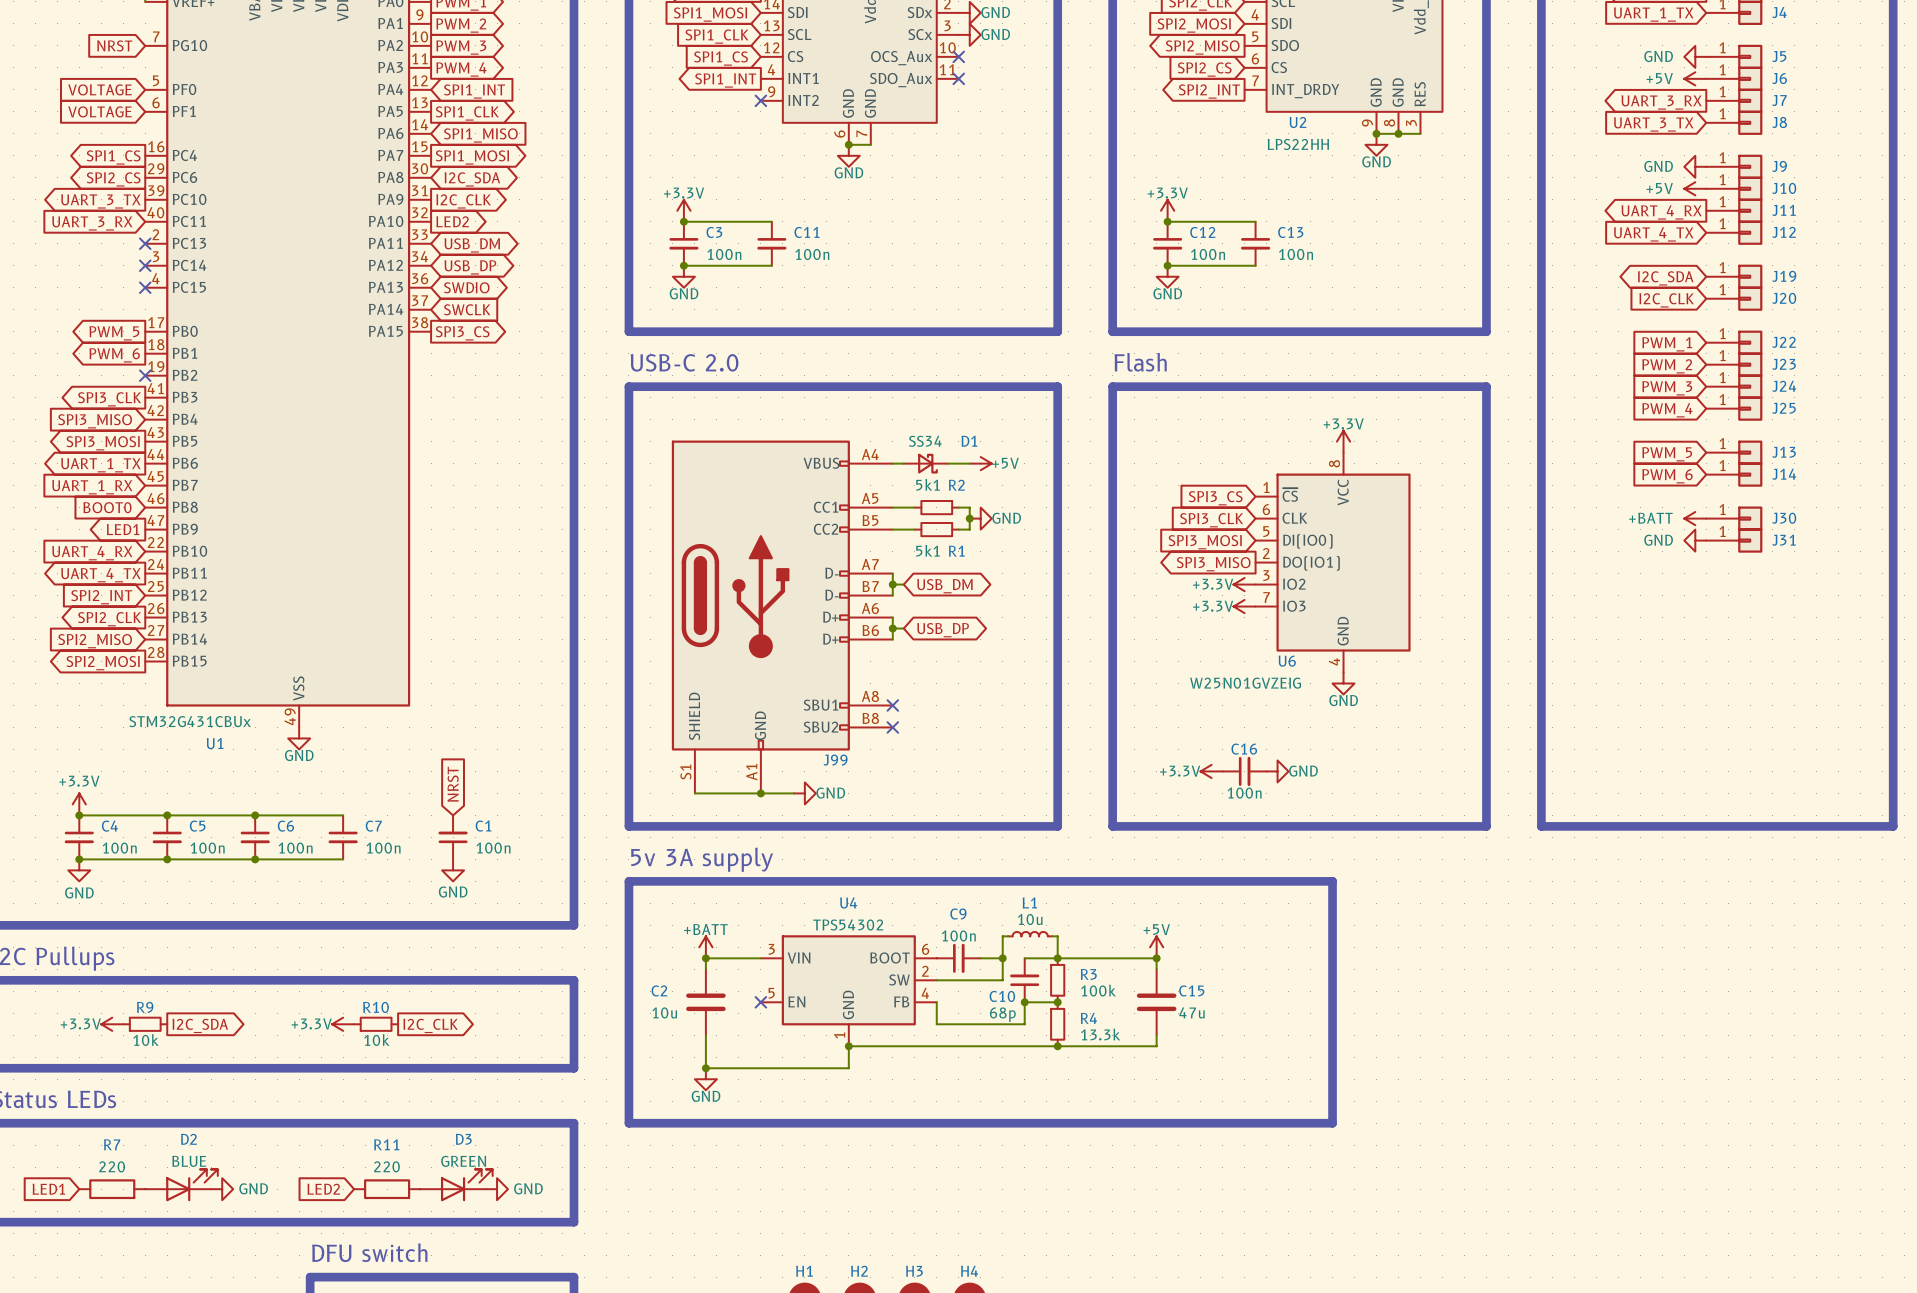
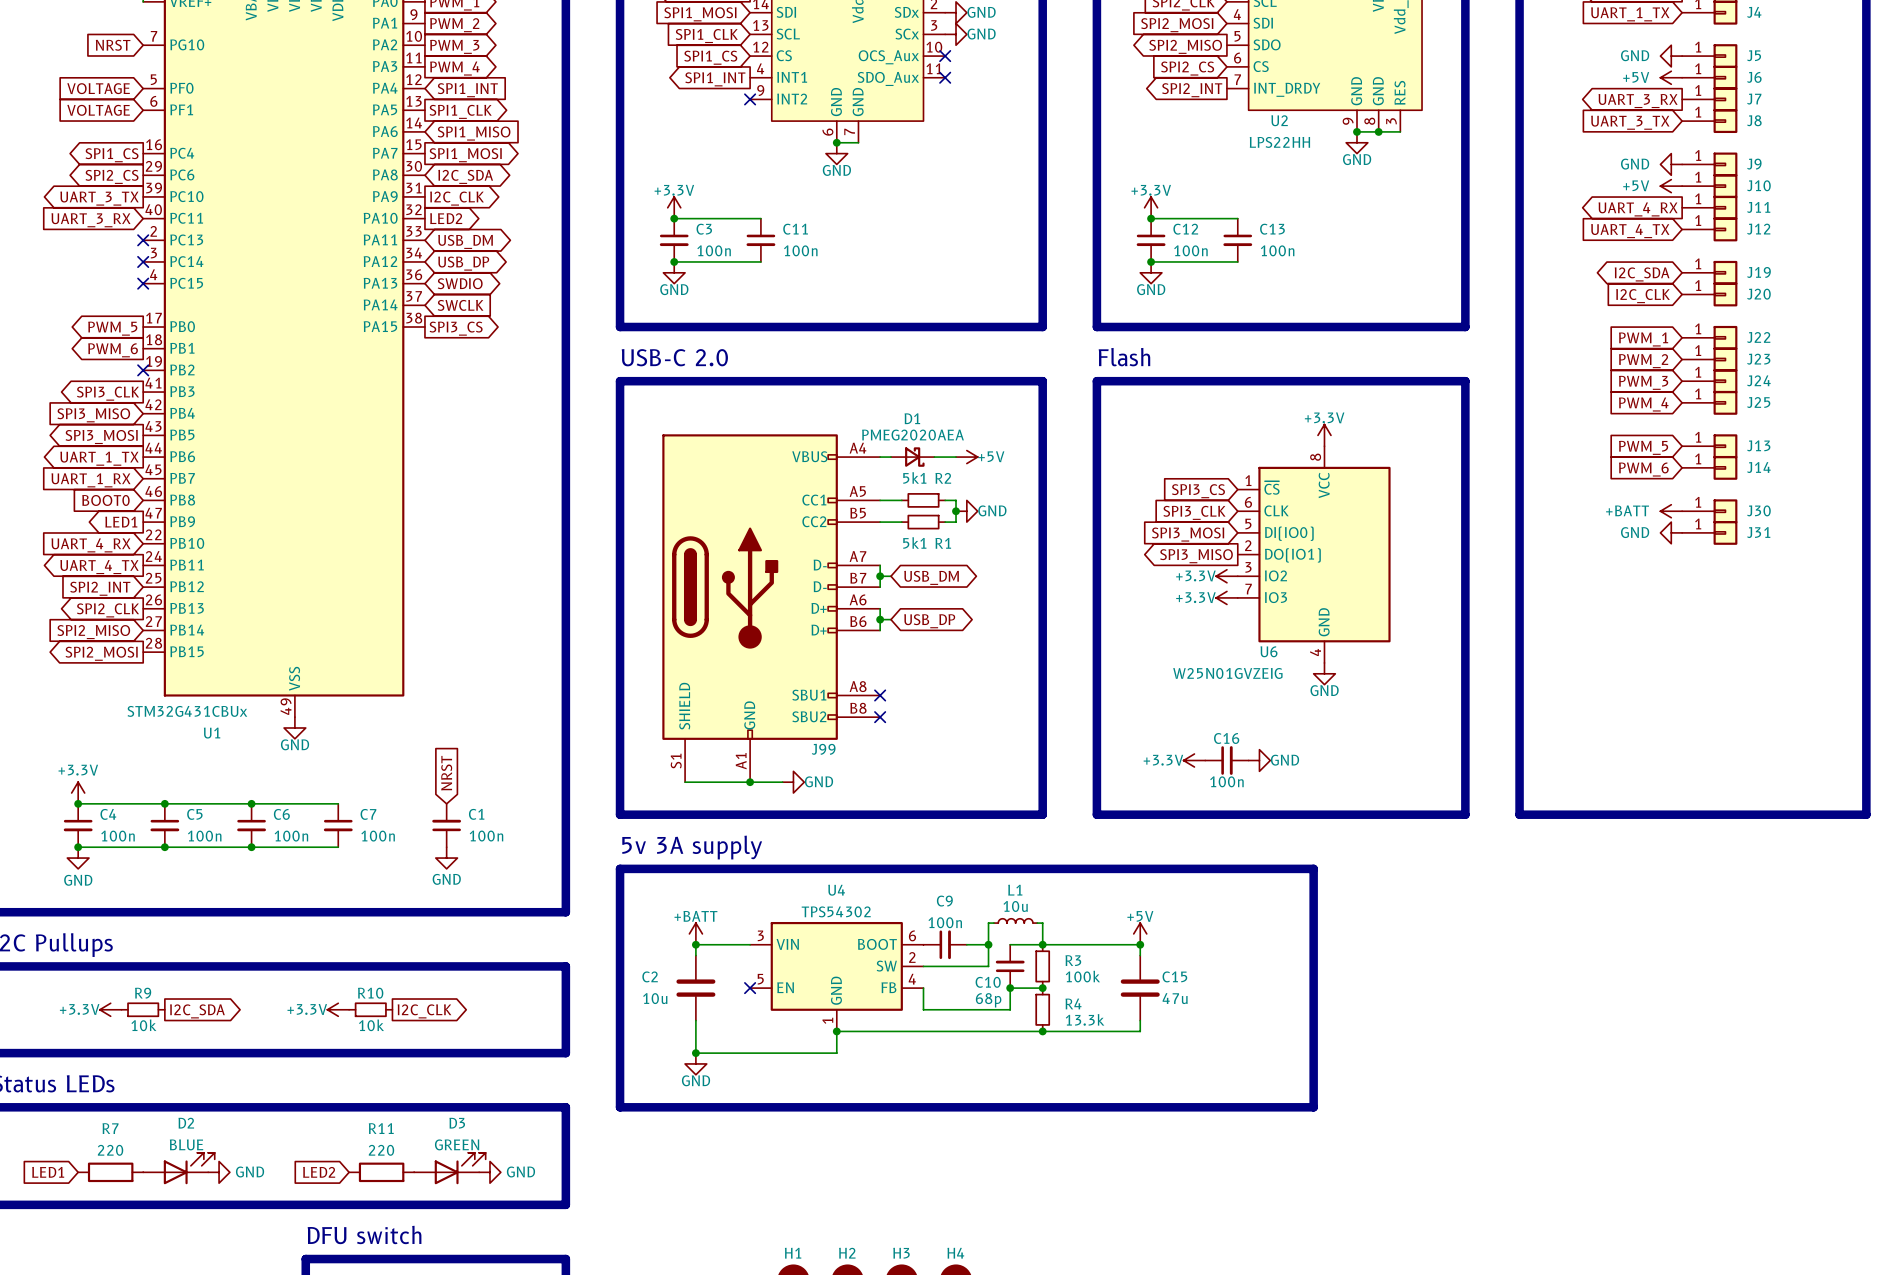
D1 value: SS34 (925, 441) -> PMEG2020AEA (912, 435)
D1 name position: D1 (969, 441) -> D1 (912, 418)

